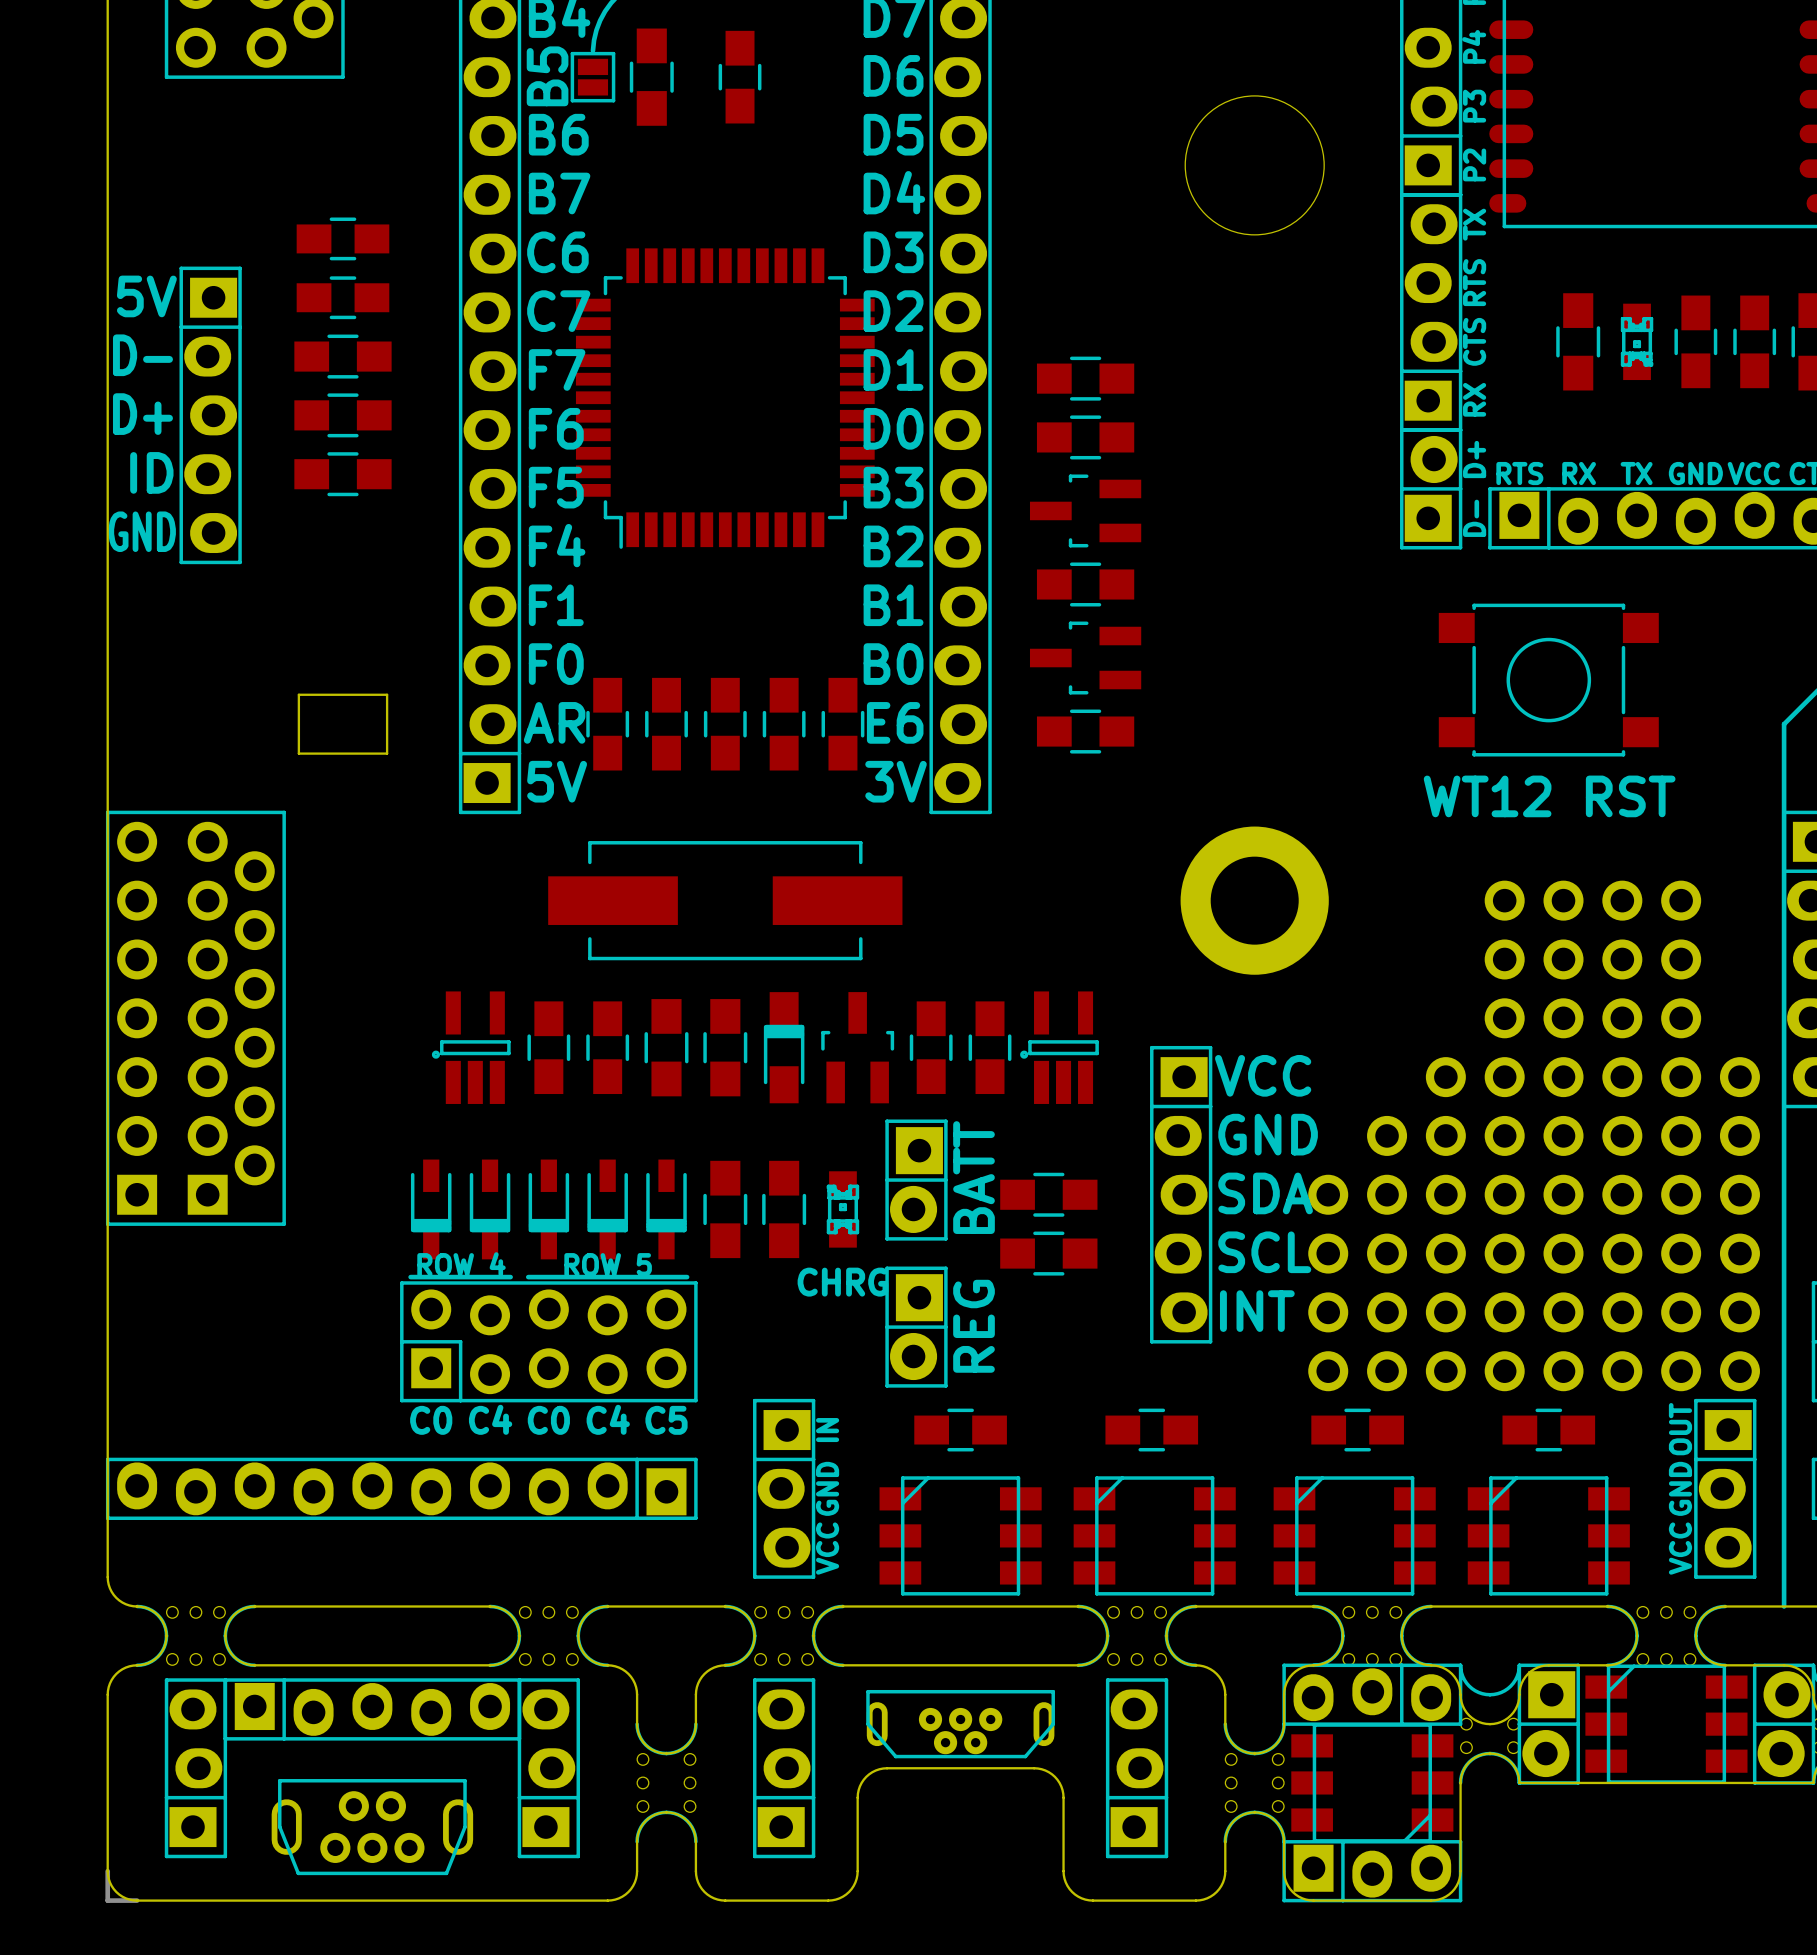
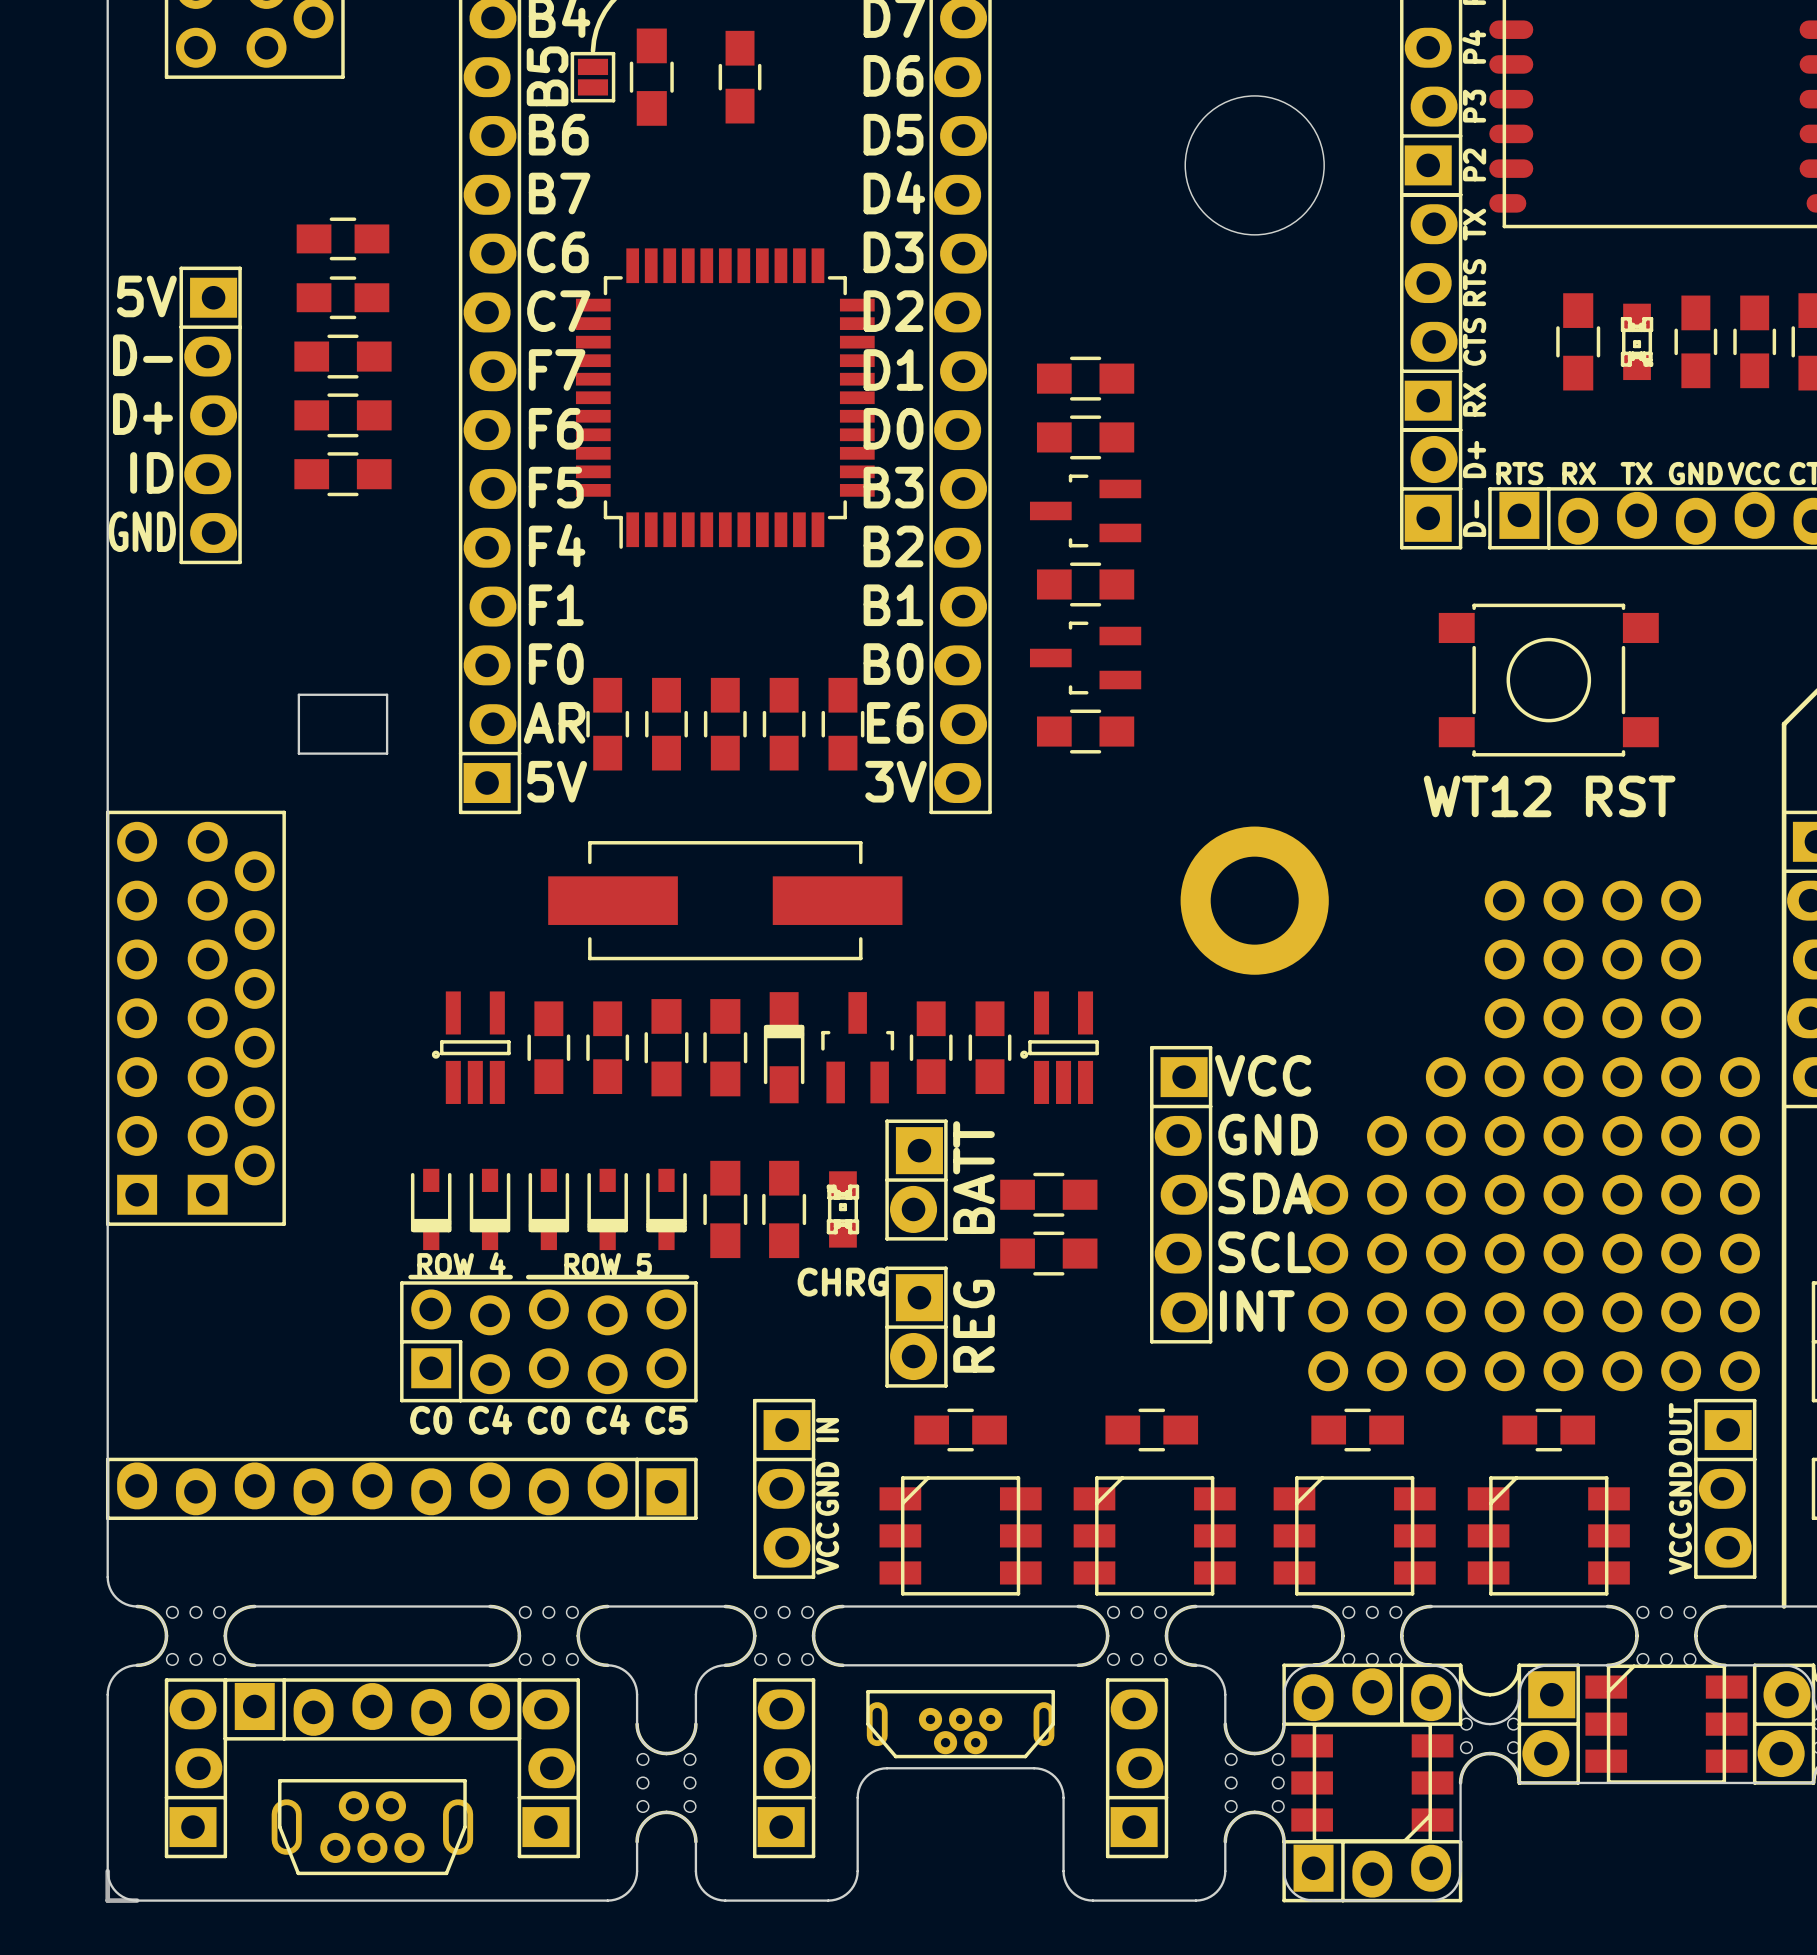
part footprint: [410, 1159, 452, 1260] -> [410, 1168, 452, 1251]
part footprint: [469, 1159, 511, 1260] -> [469, 1168, 511, 1251]
part footprint: [528, 1159, 570, 1260] -> [528, 1168, 570, 1251]
part footprint: [587, 1159, 628, 1260] -> [587, 1168, 628, 1251]
part footprint: [646, 1159, 687, 1260] -> [646, 1168, 687, 1251]

